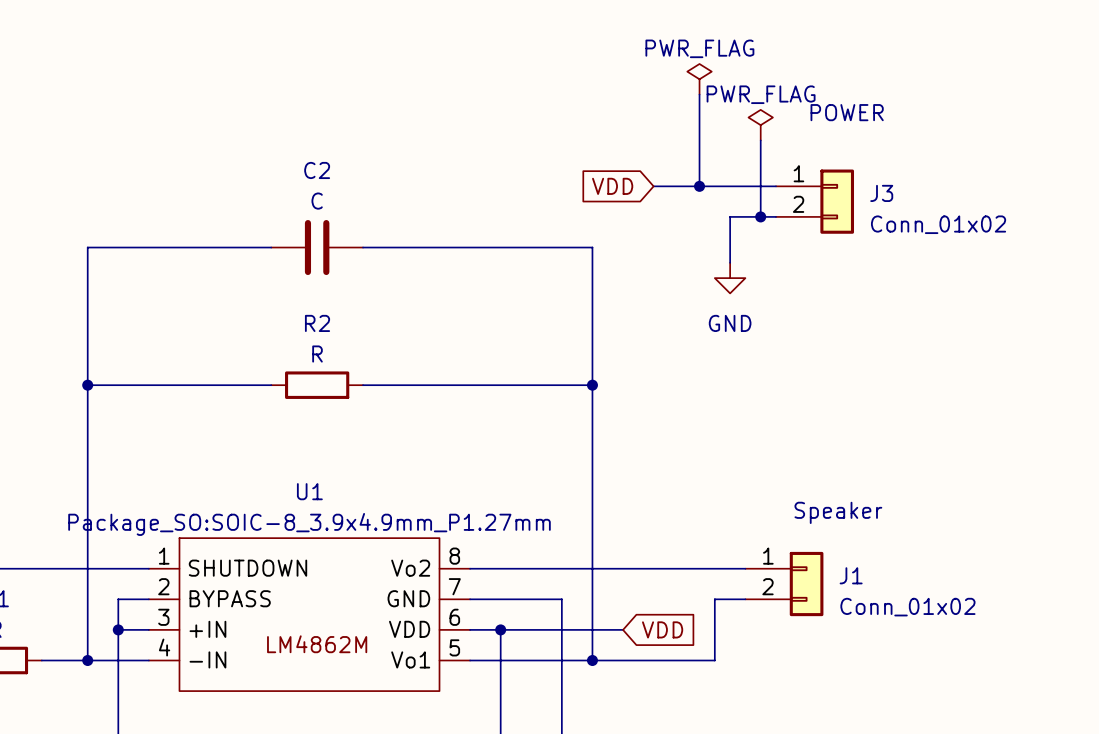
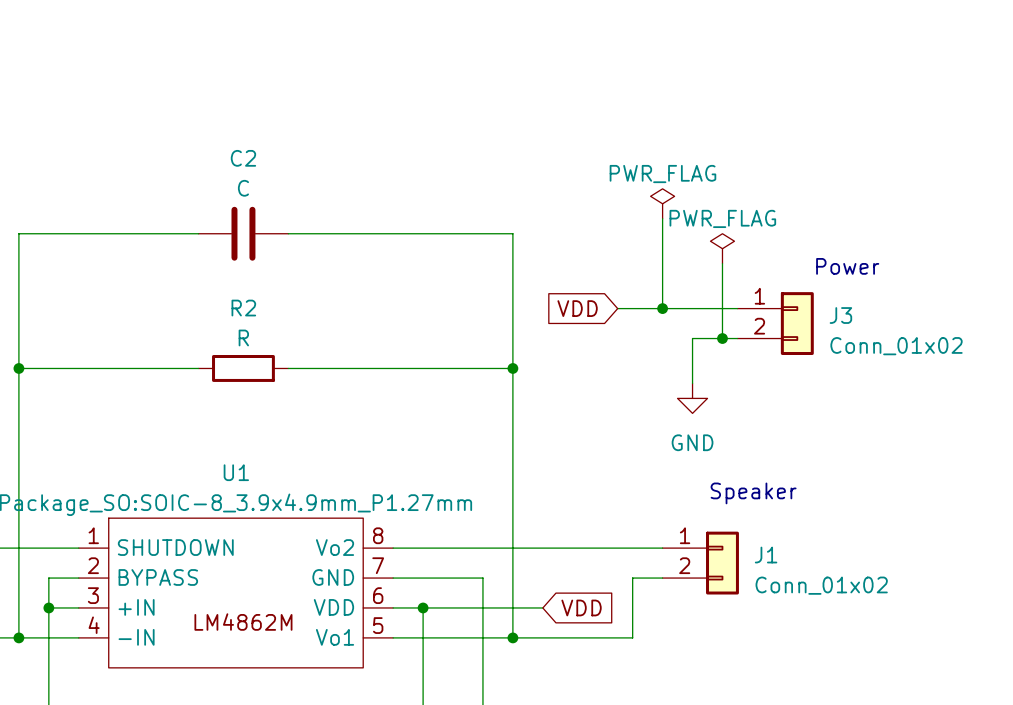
power symbol: PWR_FLAG (699, 79) -> none
wire: (699, 94) (699, 186) -> (662, 218) (662, 308)
text: POWER (847, 112) -> none
power symbol: PWR_FLAG (760, 125) -> none
wire: (760, 140) (760, 216) -> (722, 263) (722, 338)
global label position: VDD (612, 186) -> VDD (577, 308)
wire: (653, 186) (776, 186) -> (617, 308) (737, 308)
junction: (699, 186) -> none
J3 position: (815, 201) -> (775, 323)
power symbol: none -> PWR_FLAG (662, 203)
junction: (760, 216) -> none
wire: (776, 216) (730, 216) (730, 262) -> (737, 338) (692, 338) (692, 383)
power symbol: none -> PWR_FLAG (722, 248)
power symbol position: GND (730, 278) -> GND (692, 398)
text: none -> Power (847, 266)
junction: none -> (662, 308)
junction: none -> (722, 338)

